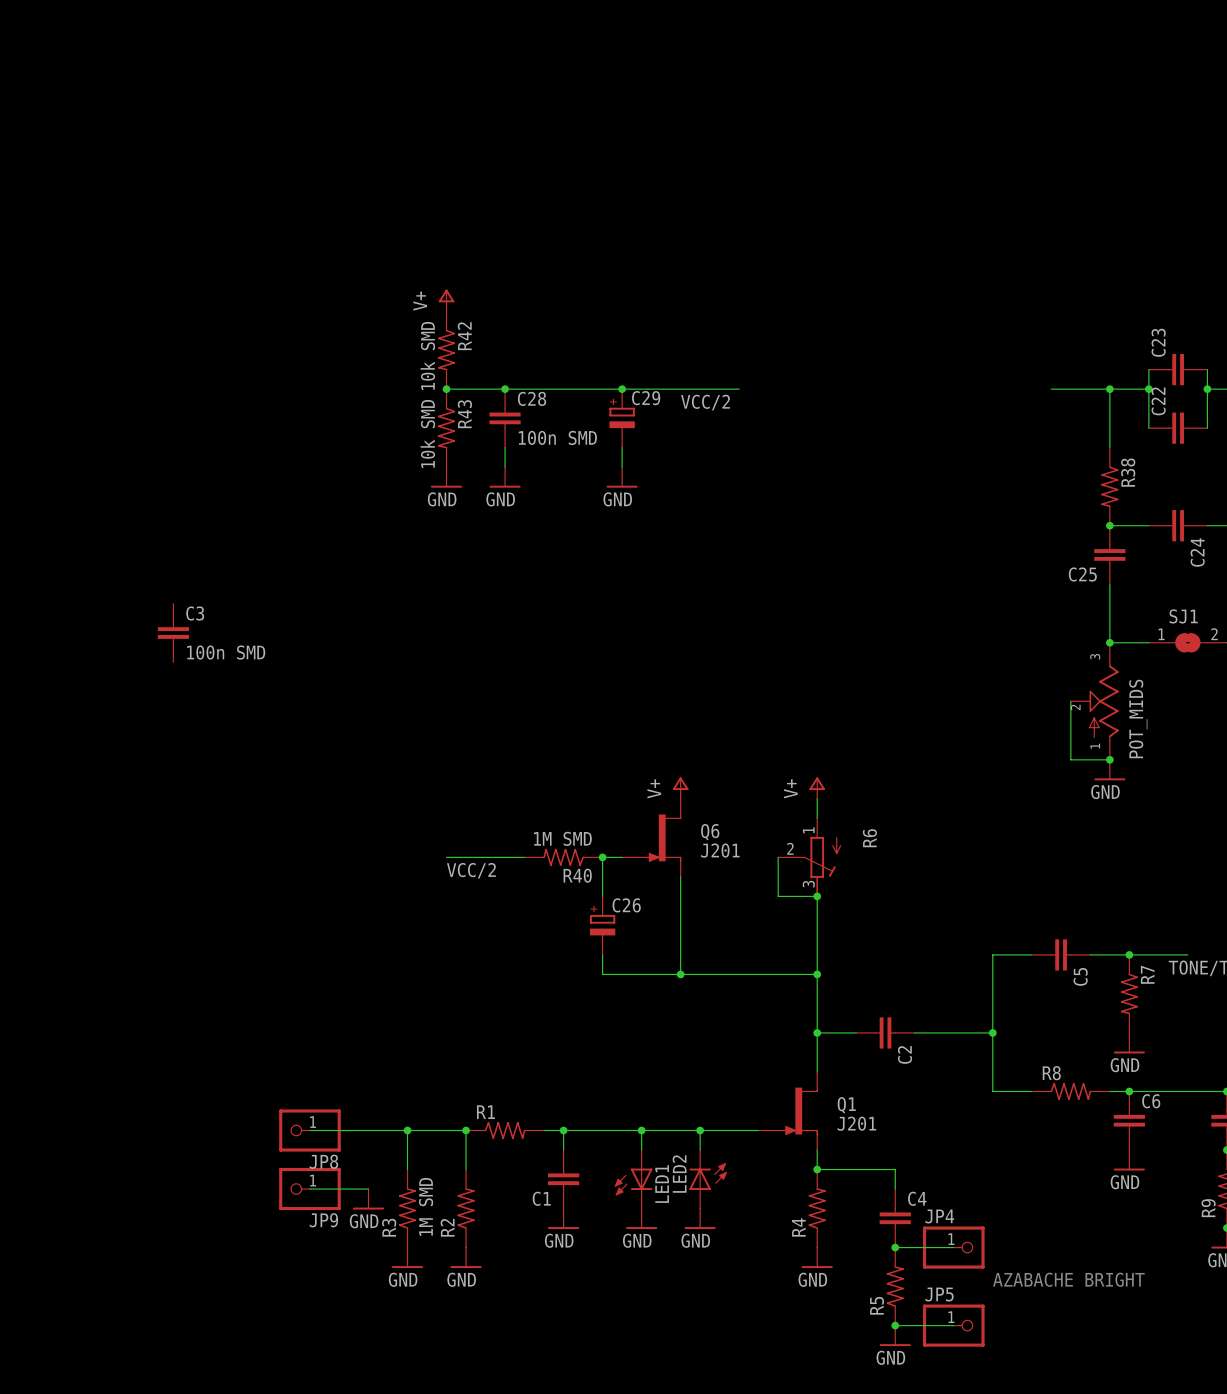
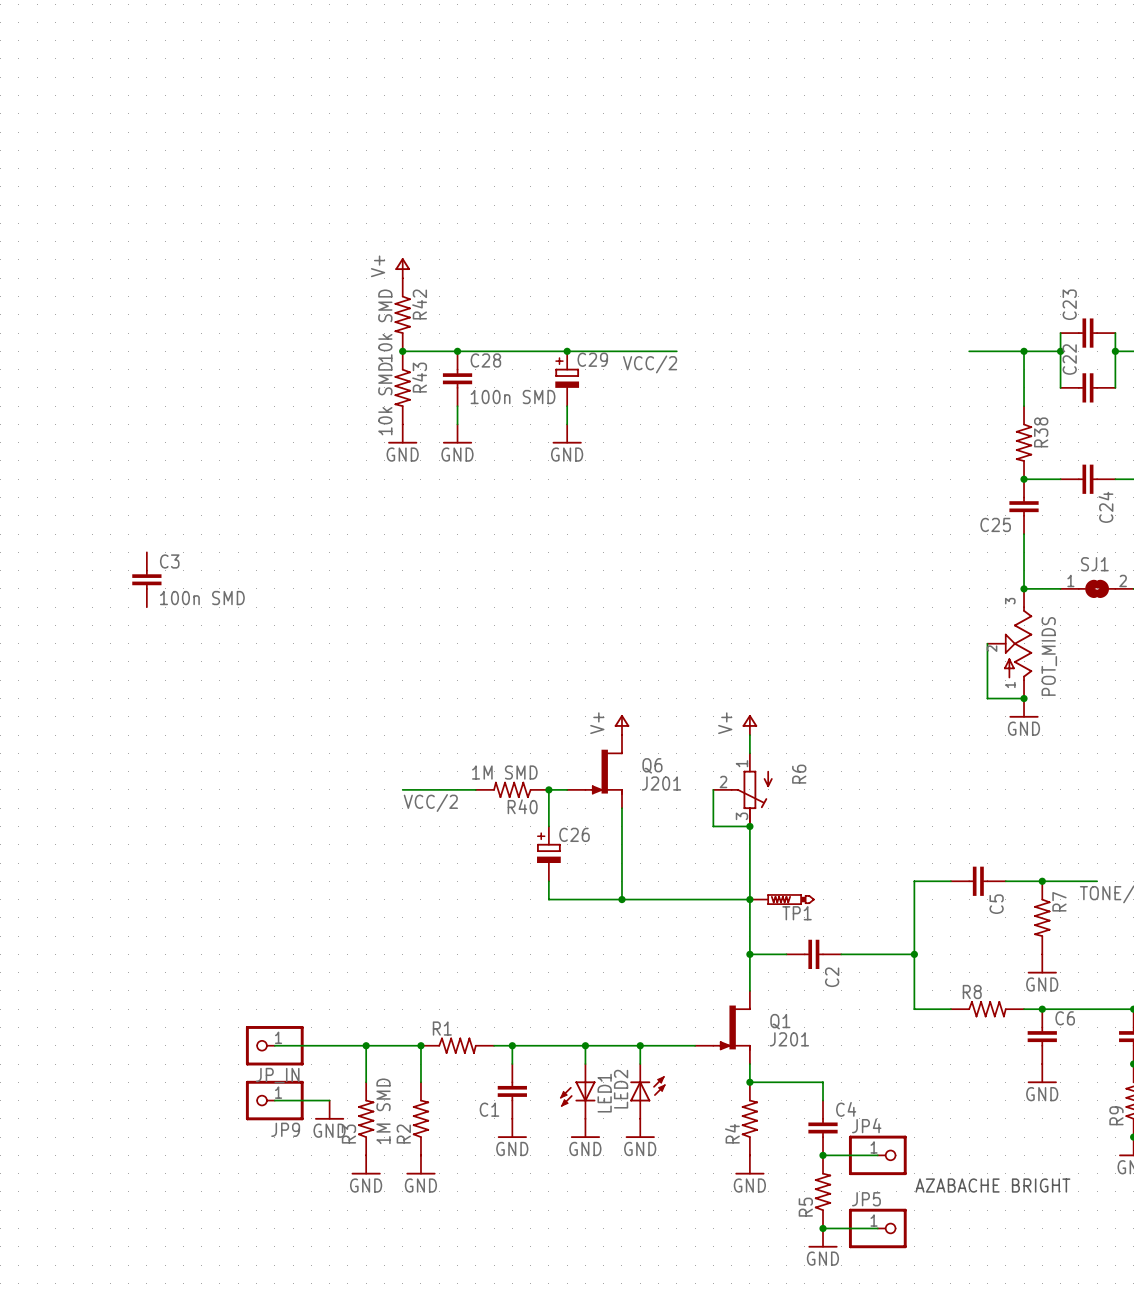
TP1: none -> (782, 899)
JP8 name: JP8 (323, 1161) -> JP_IN (277, 1075)

